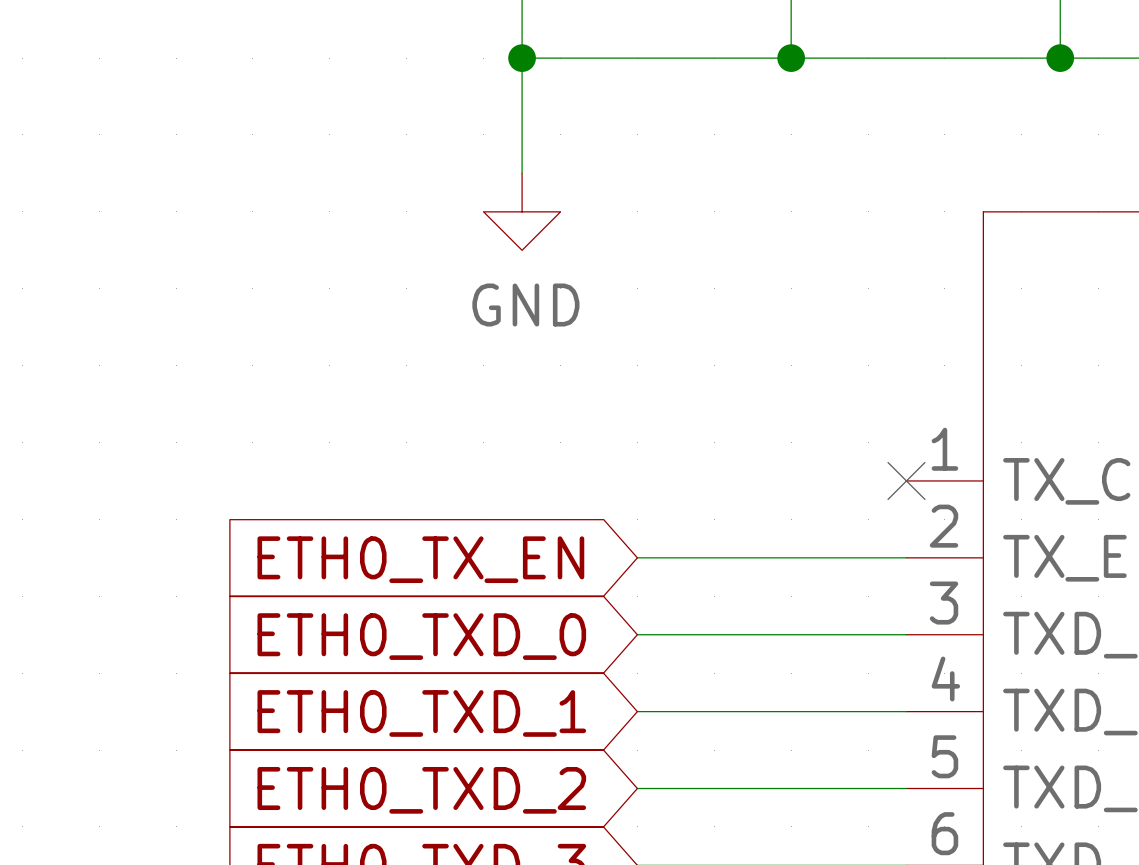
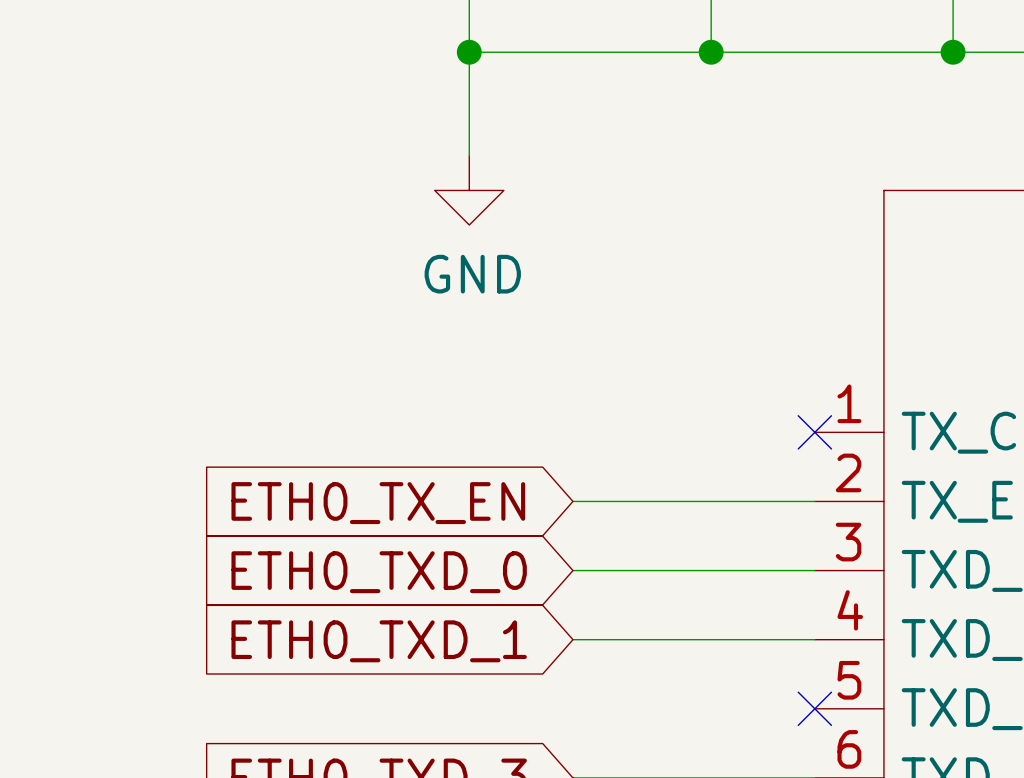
wire: (637, 788) (906, 788) -> none
no-connect mark: none -> (814, 708)
global label: ETH0_TXD_2 (421, 790) -> none

